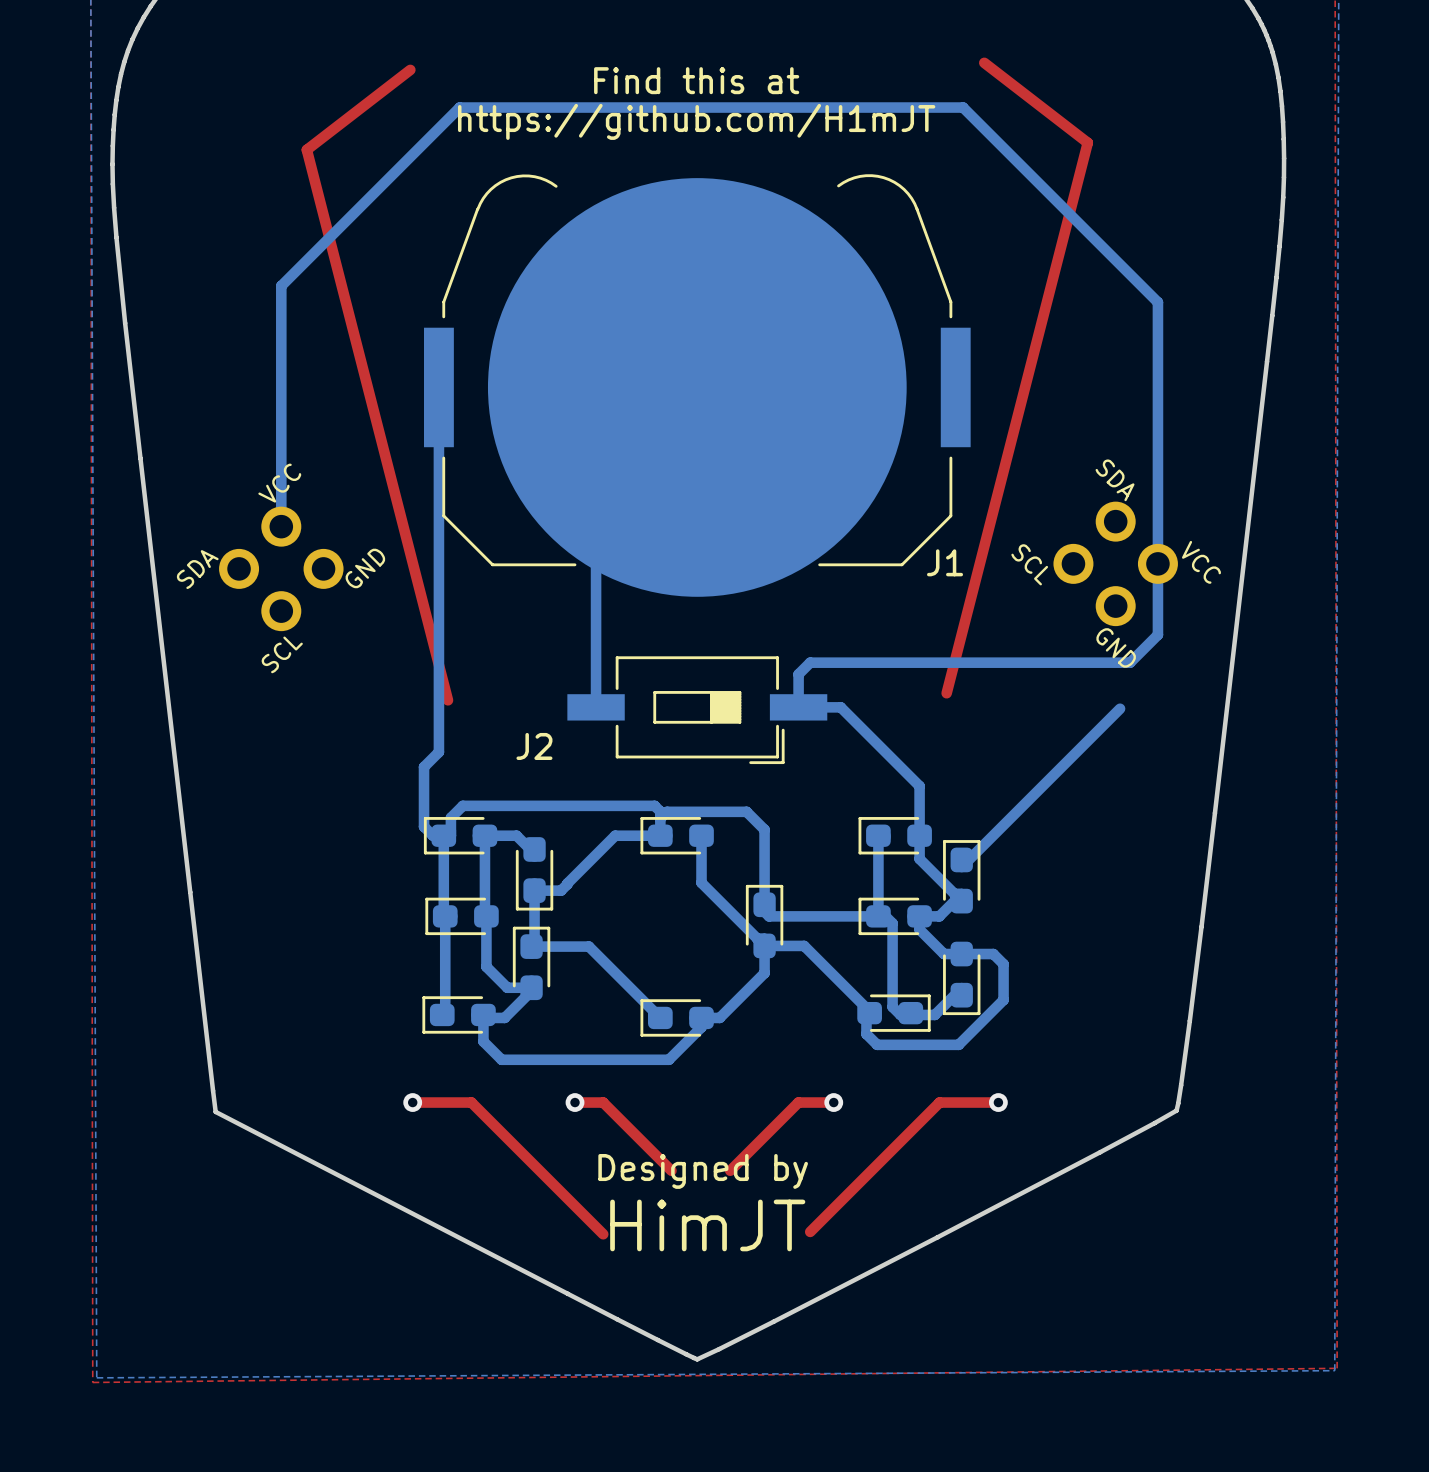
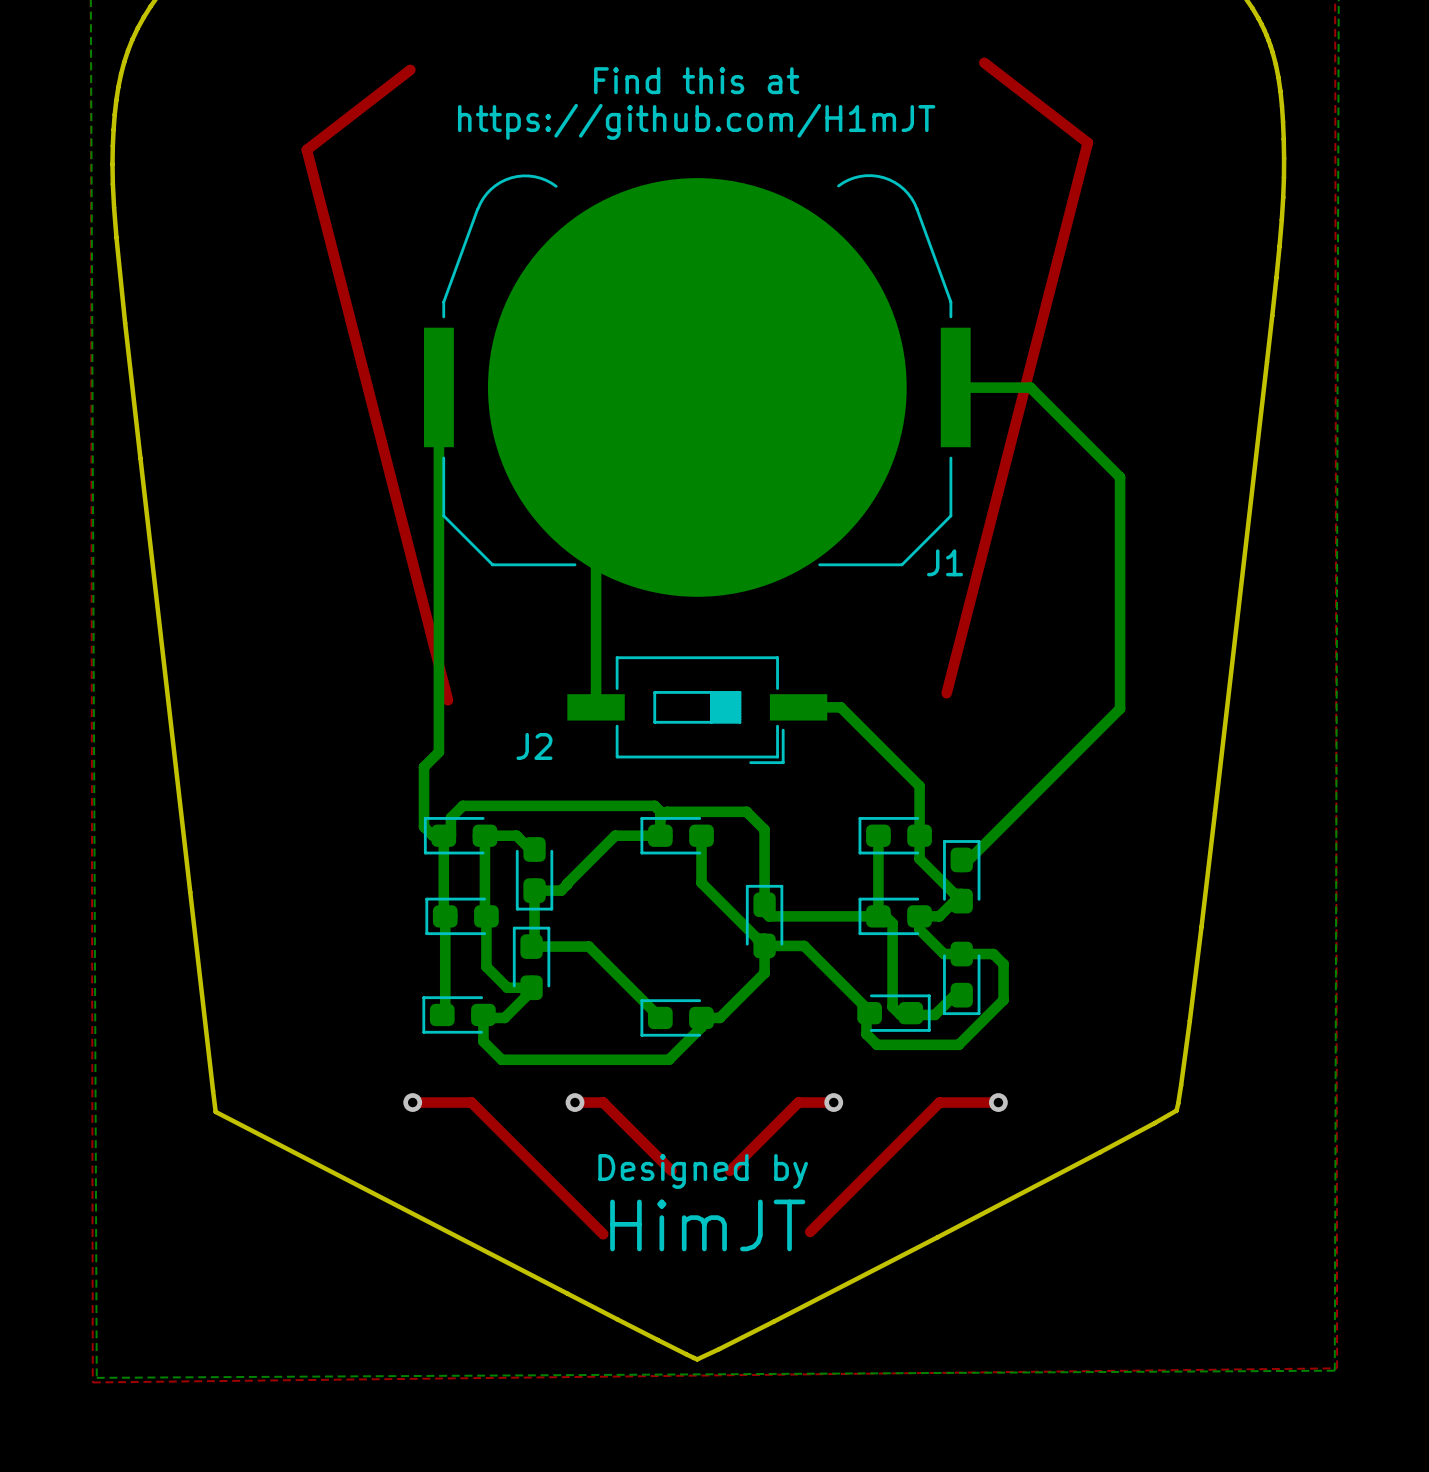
bottom track: none -> (955, 387) (1030, 387) (1120, 477) (1120, 708)
bottom track: (281, 526) (281, 285) (459, 107) (963, 107) (1157, 302) (1157, 634) (1130, 662) (810, 662) (798, 674) (798, 707) -> none
part: (1115, 563) -> none
part: (281, 568) -> none

